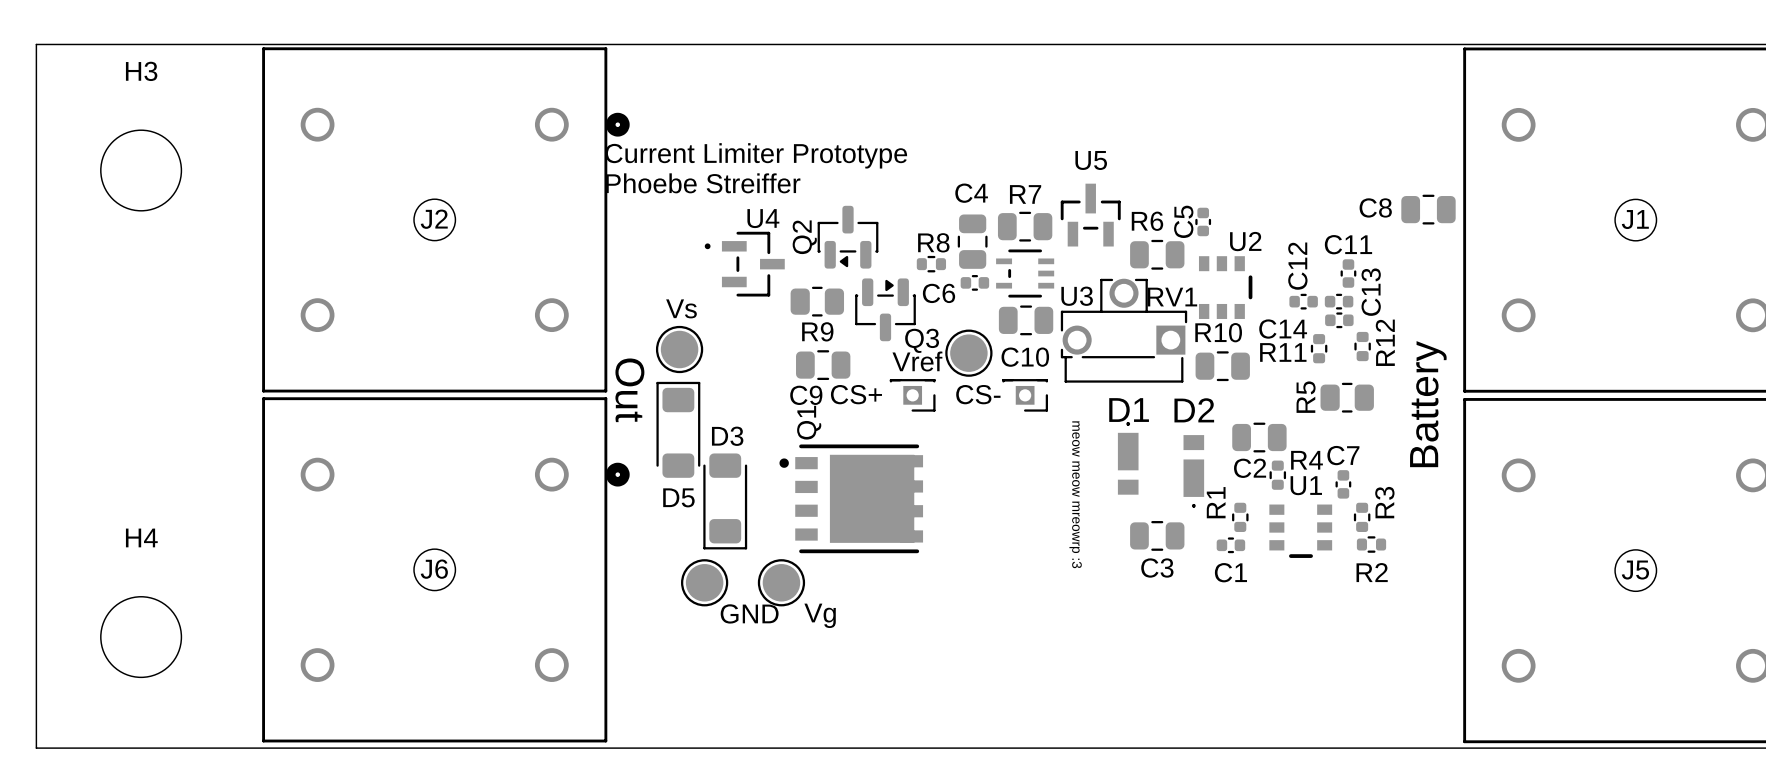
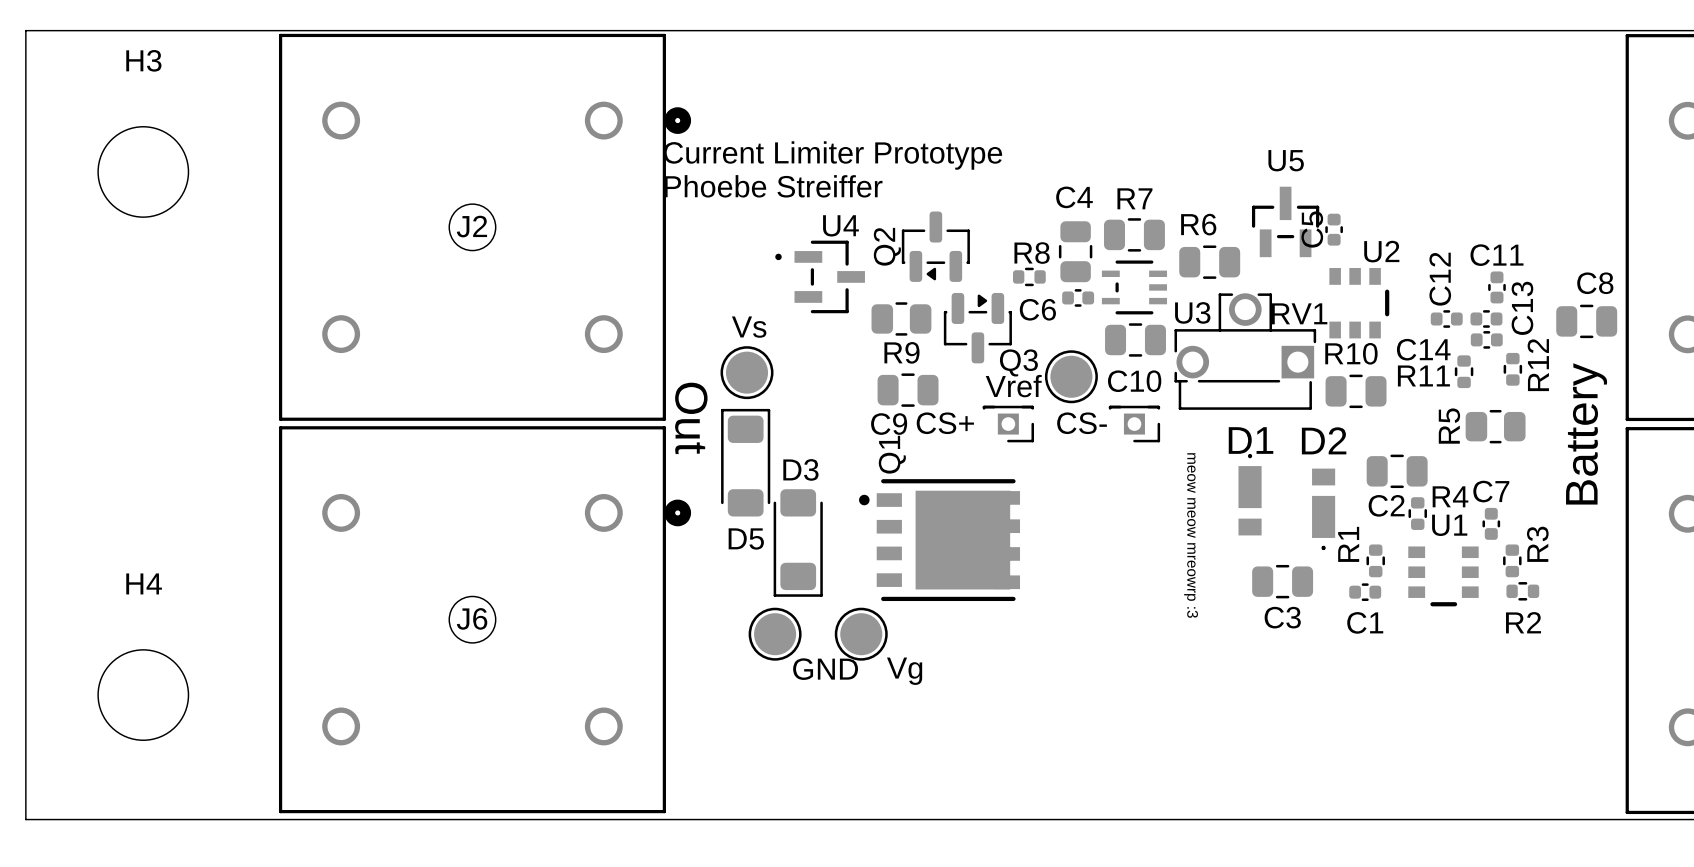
C8 name position: C8 (1375, 207) -> C8 (1595, 283)
C8 position: (1428, 209) -> (1586, 321)
U5 position: (1090, 215) -> (1285, 221)
R6 position: (1157, 254) -> (1209, 262)

